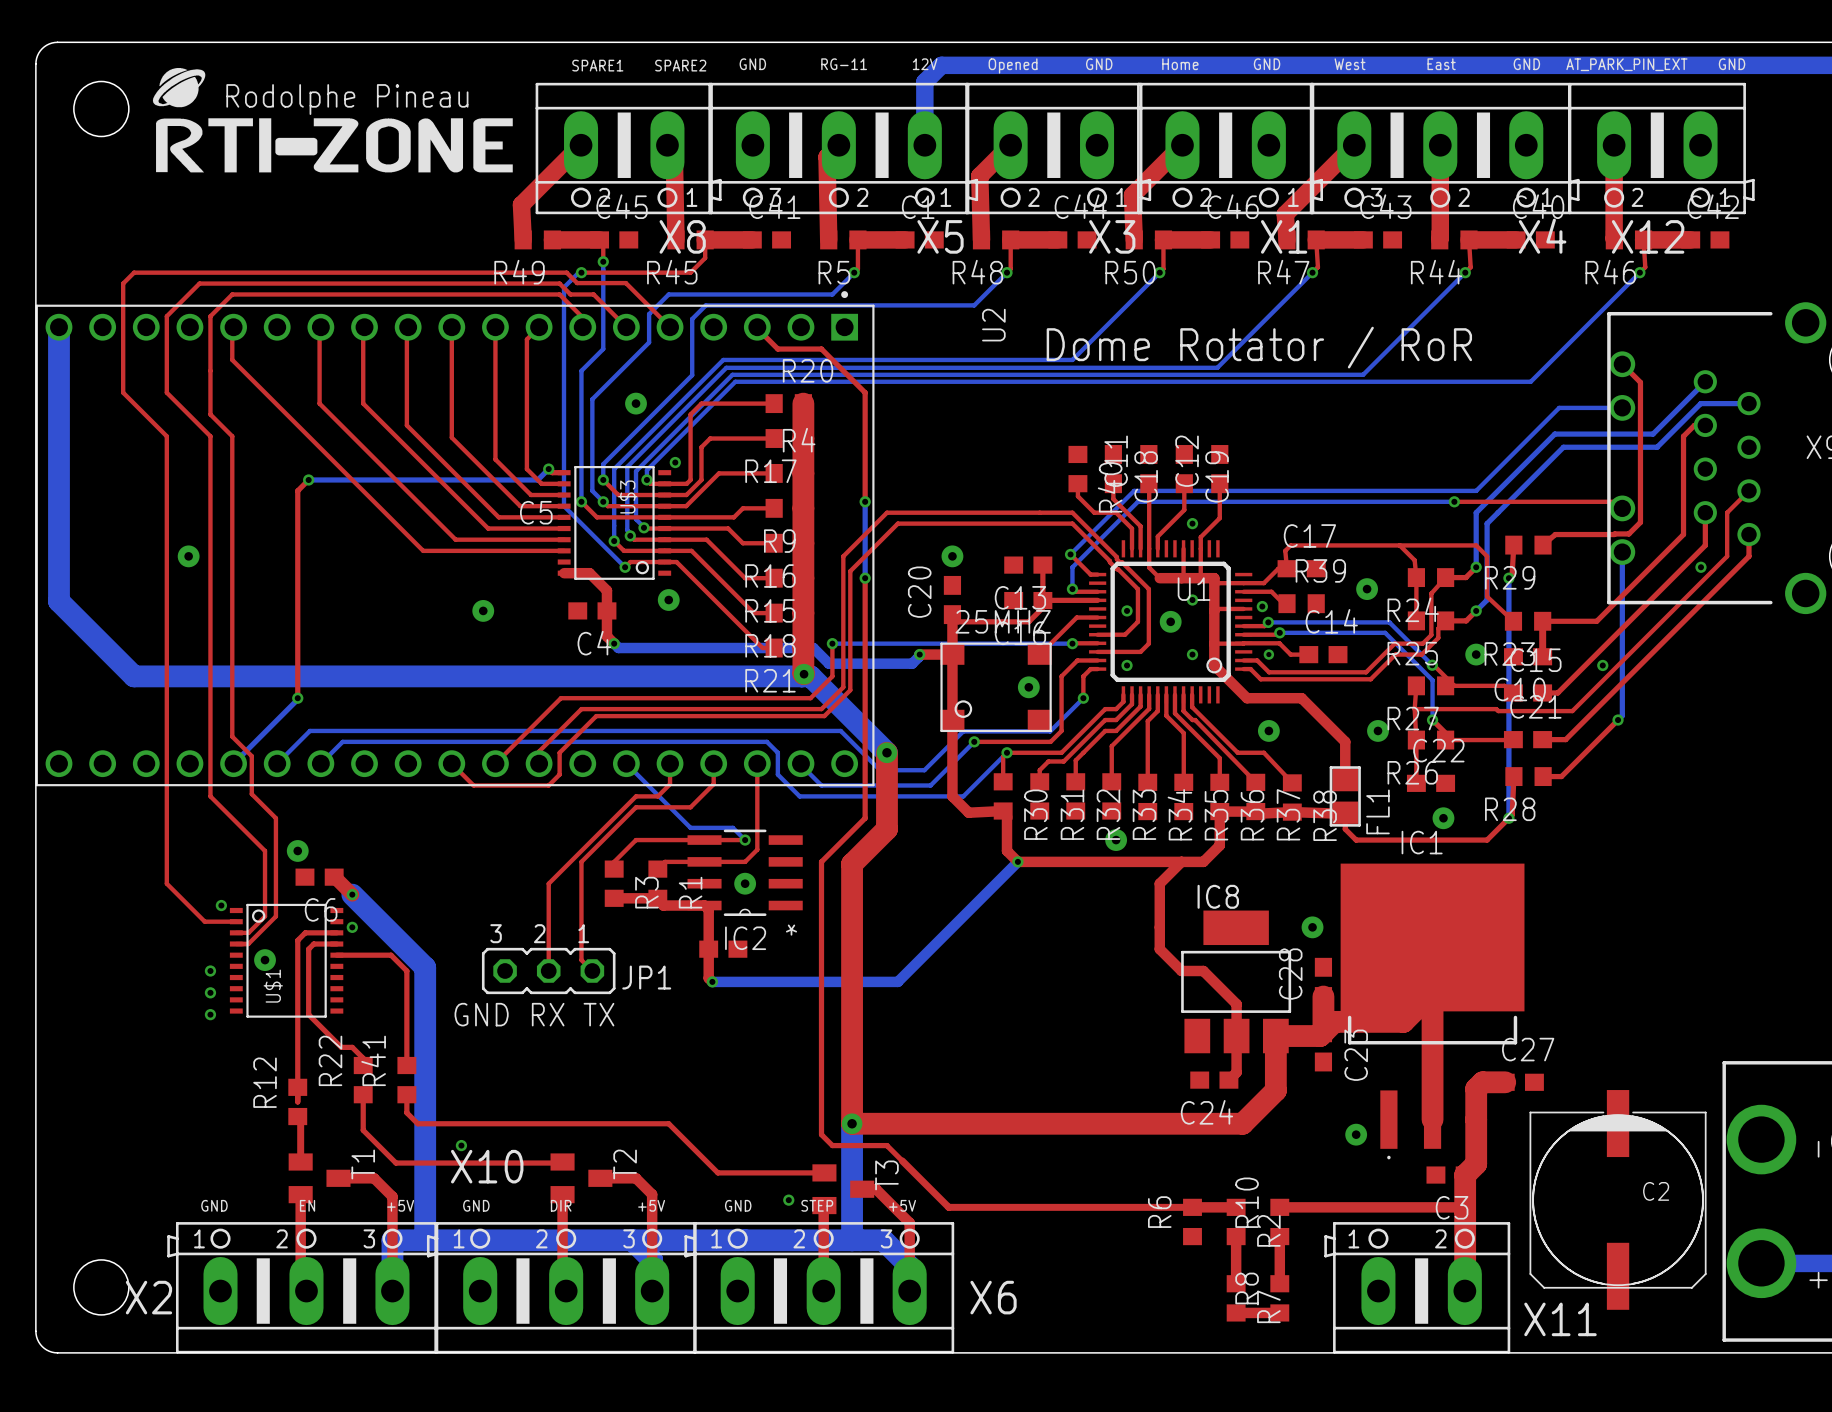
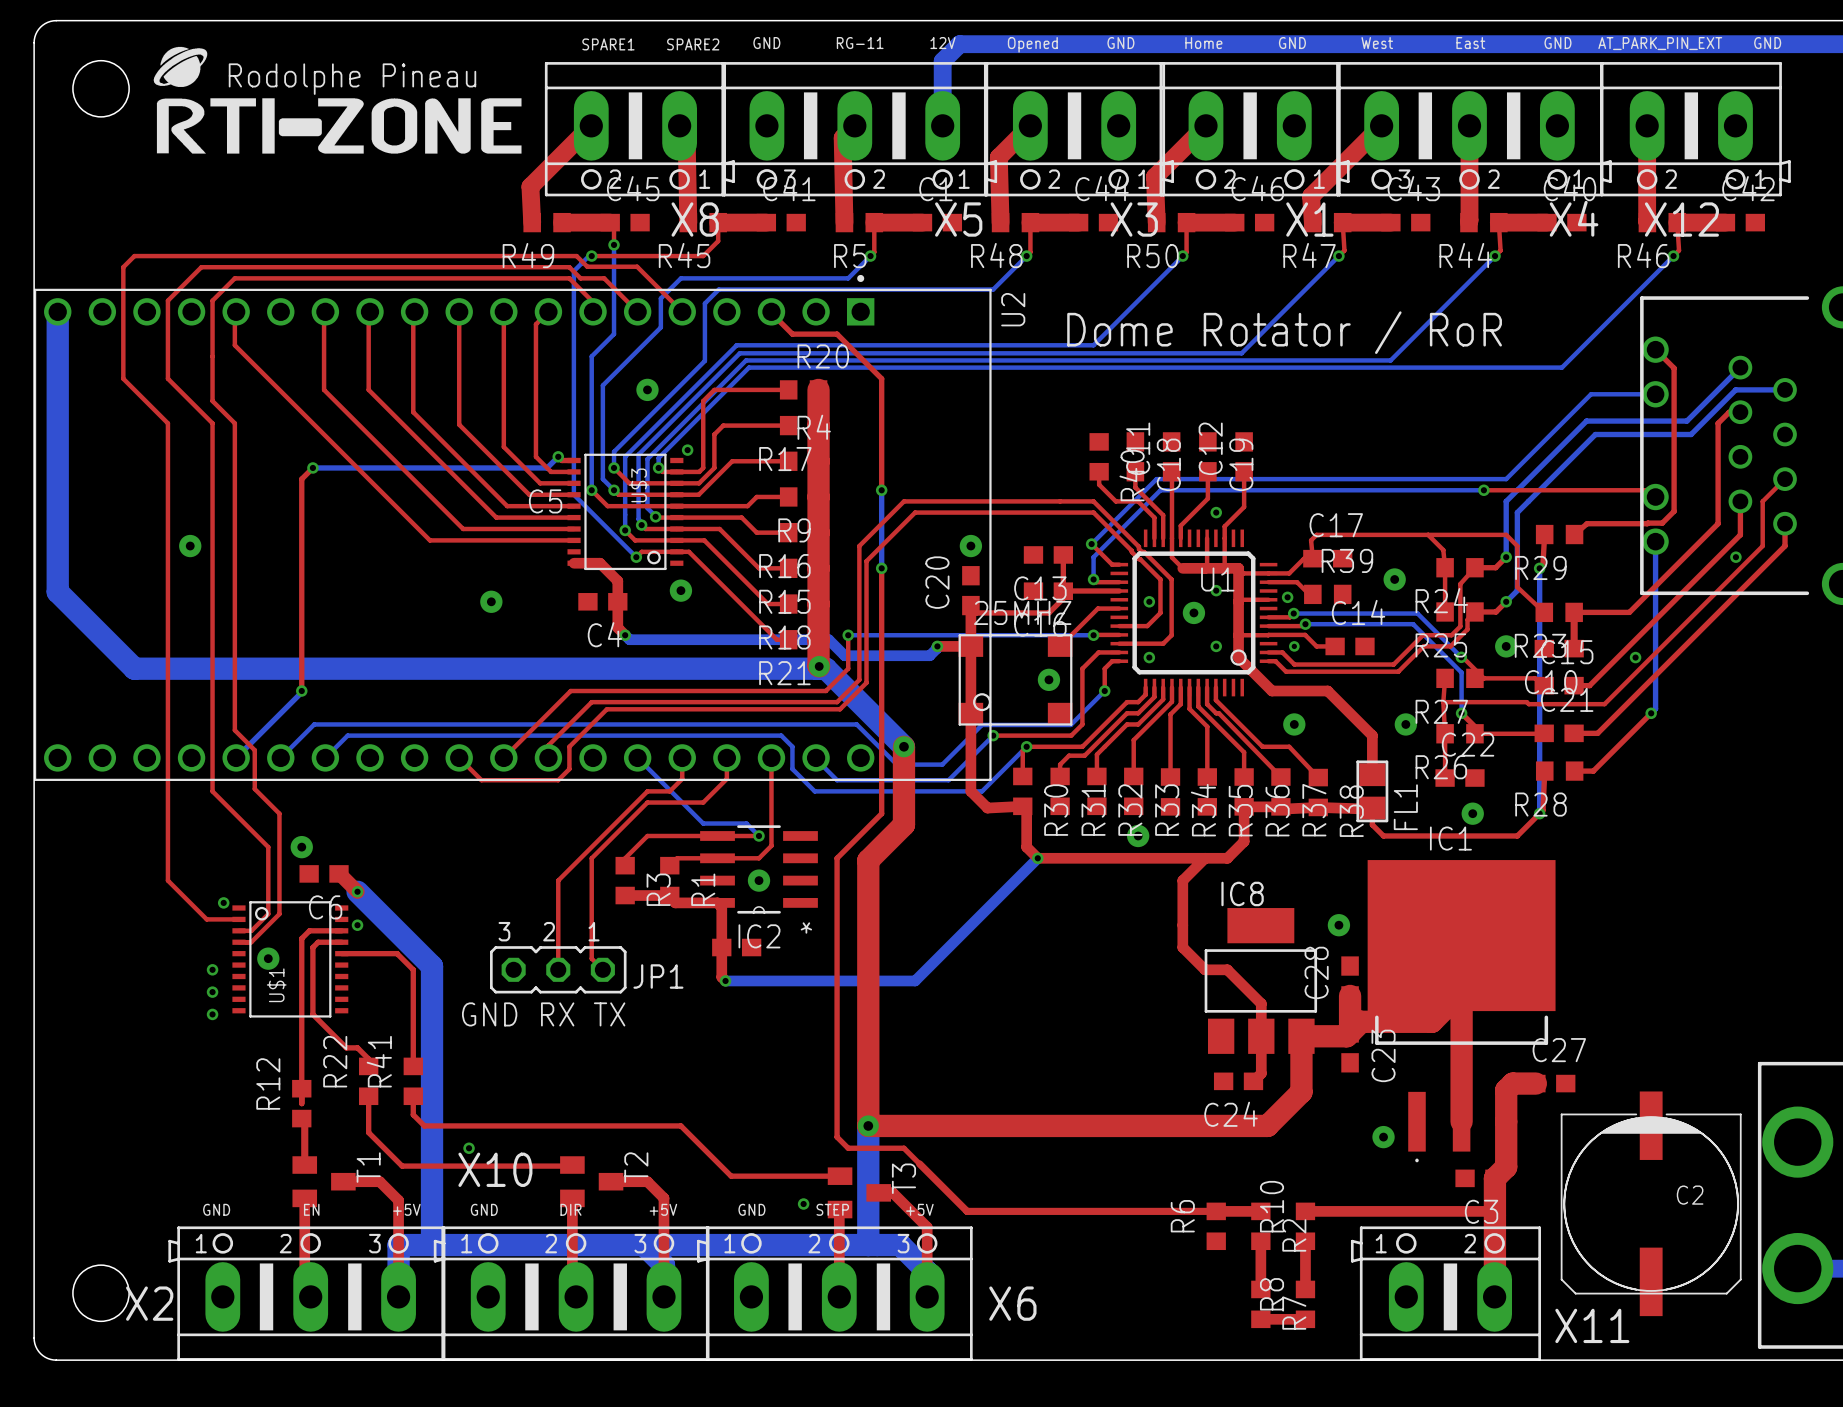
U2 footprint: [35, 291, 875, 787] -> [33, 274, 992, 781]

